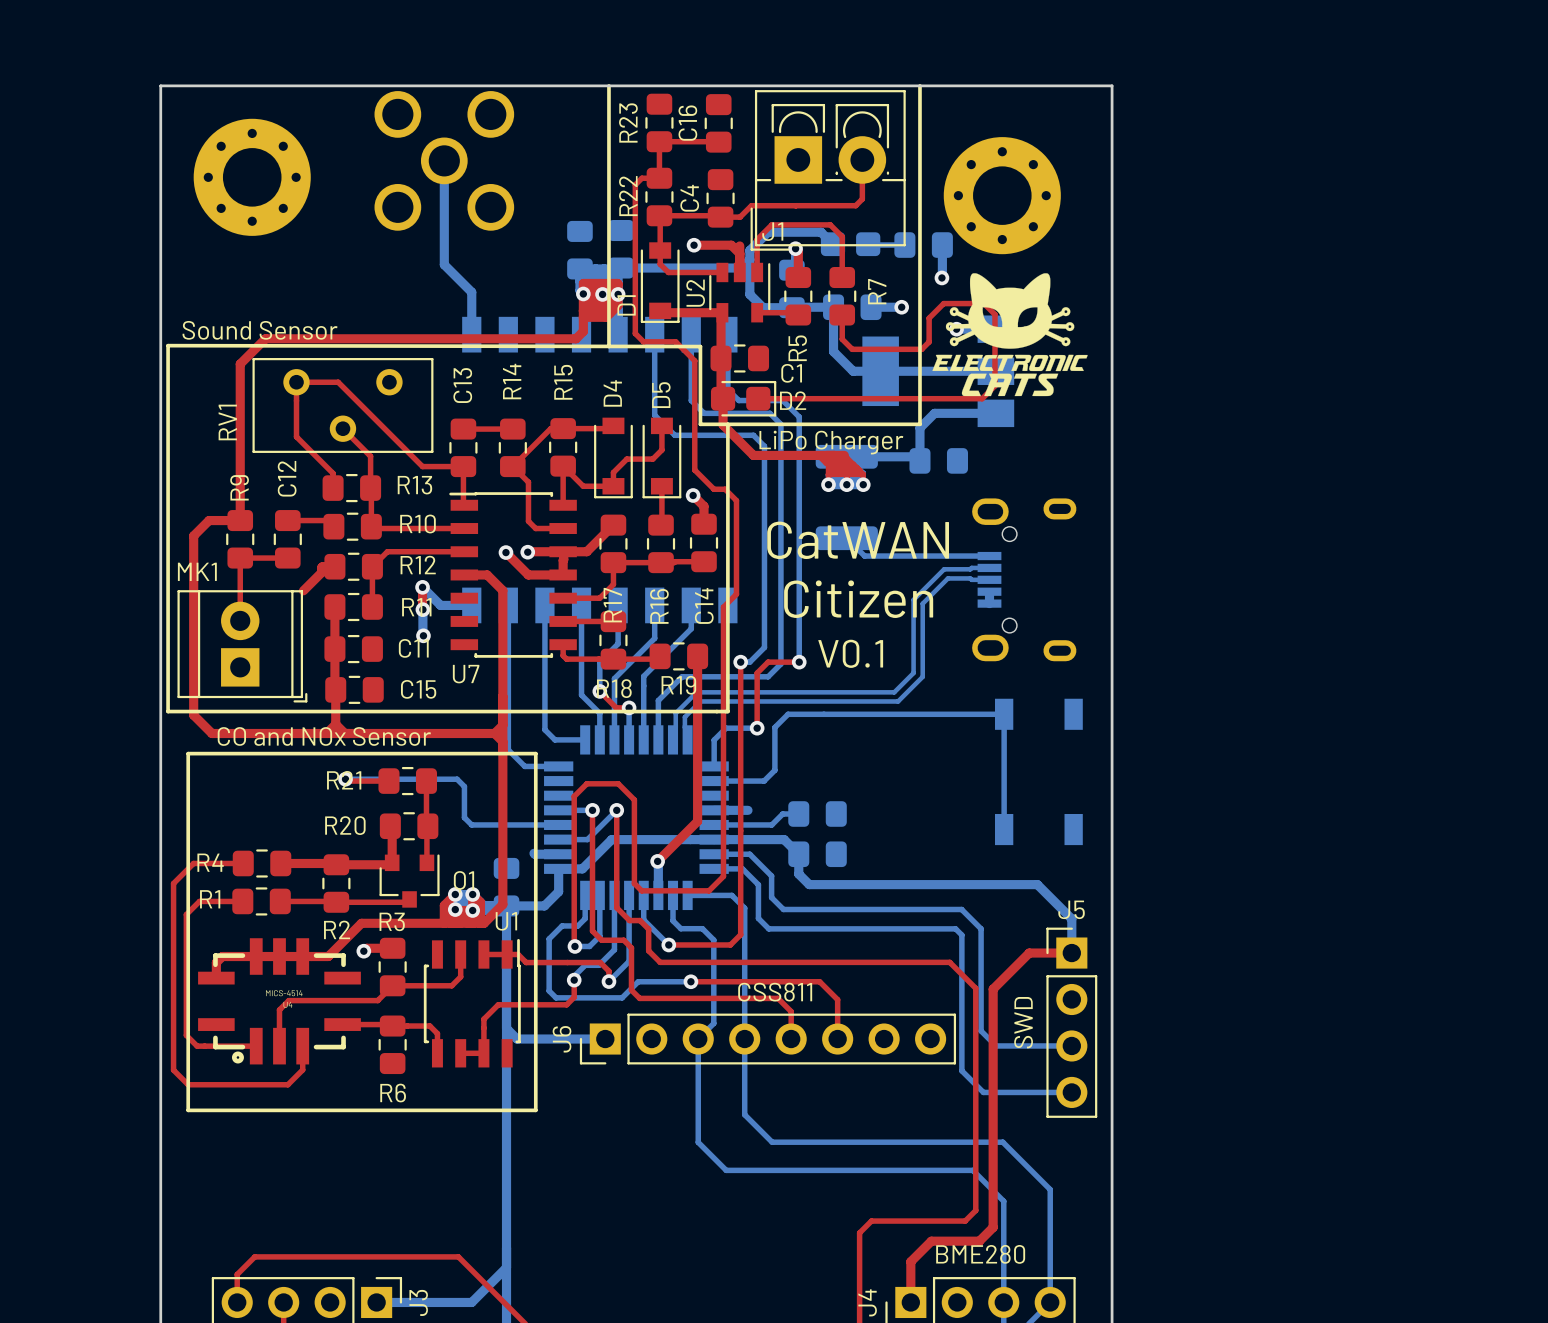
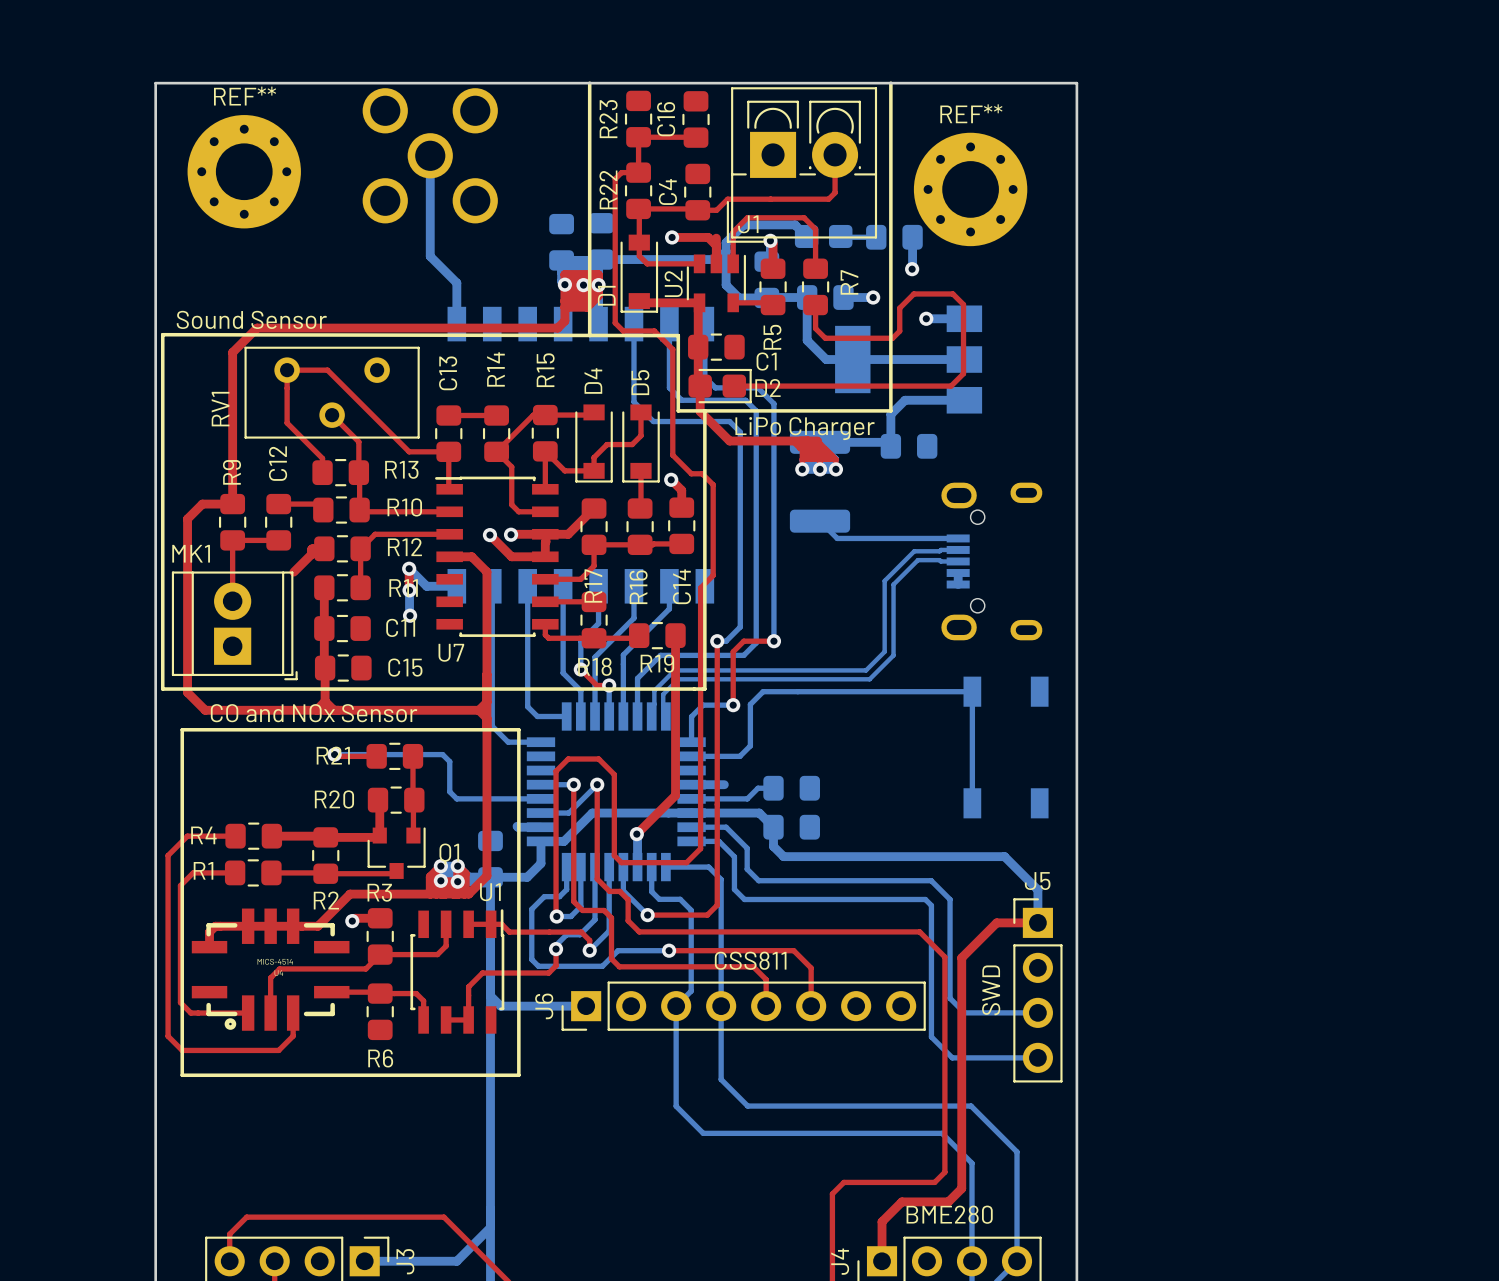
REF** name: none -> REF** (245, 96)
REF** name: none -> REF** (971, 113)
drawing: [932, 273, 1088, 397] -> none
text: CatWAN (858, 540) -> none
text: Citizen (858, 599) -> none
text: V0.1 (850, 653) -> none

